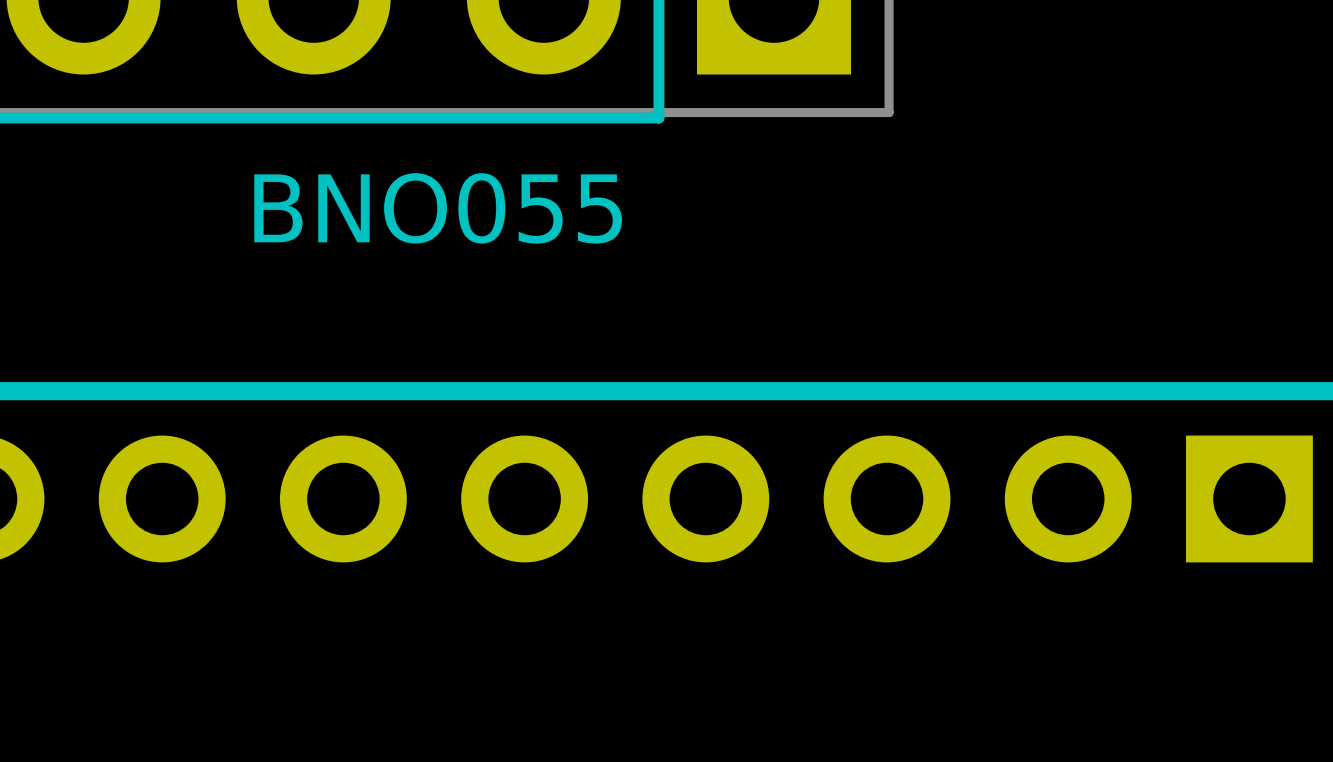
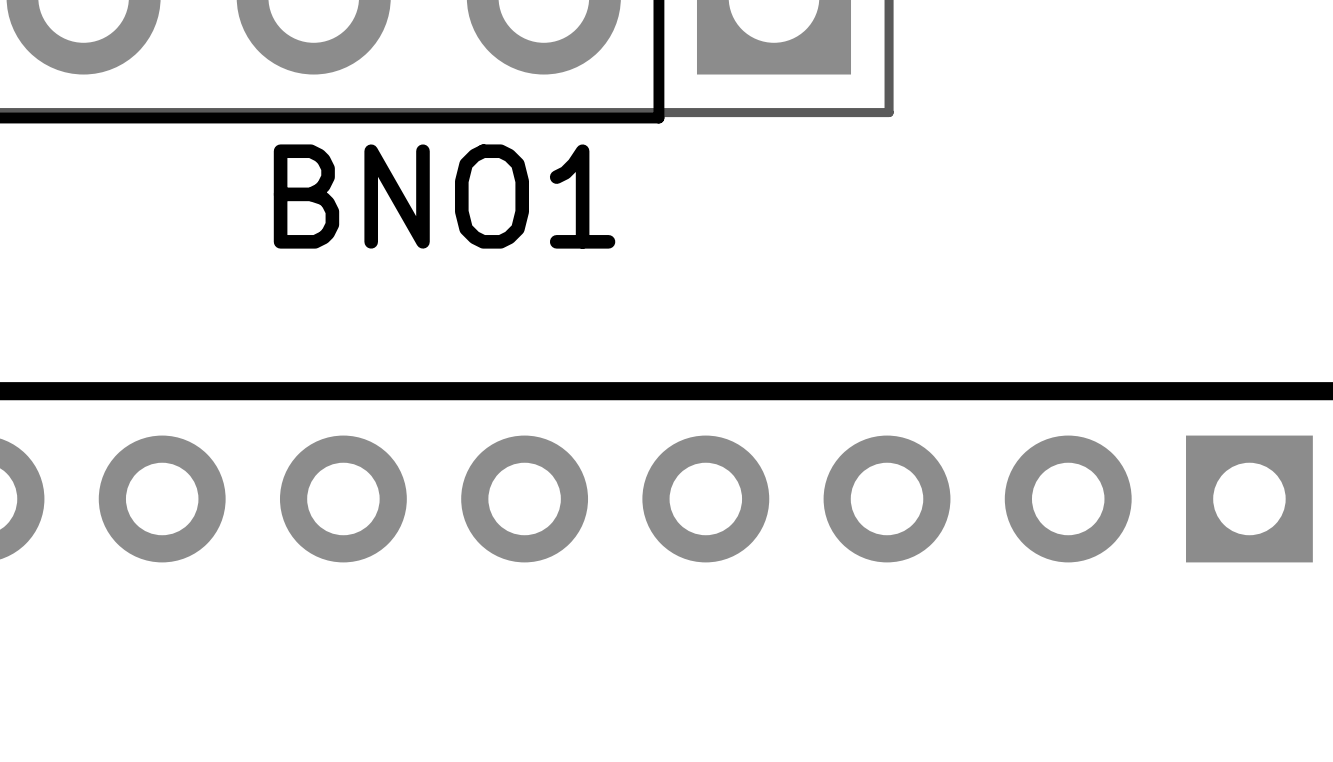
BNO055 name: BNO055 (438, 208) -> BNO1 (444, 196)

